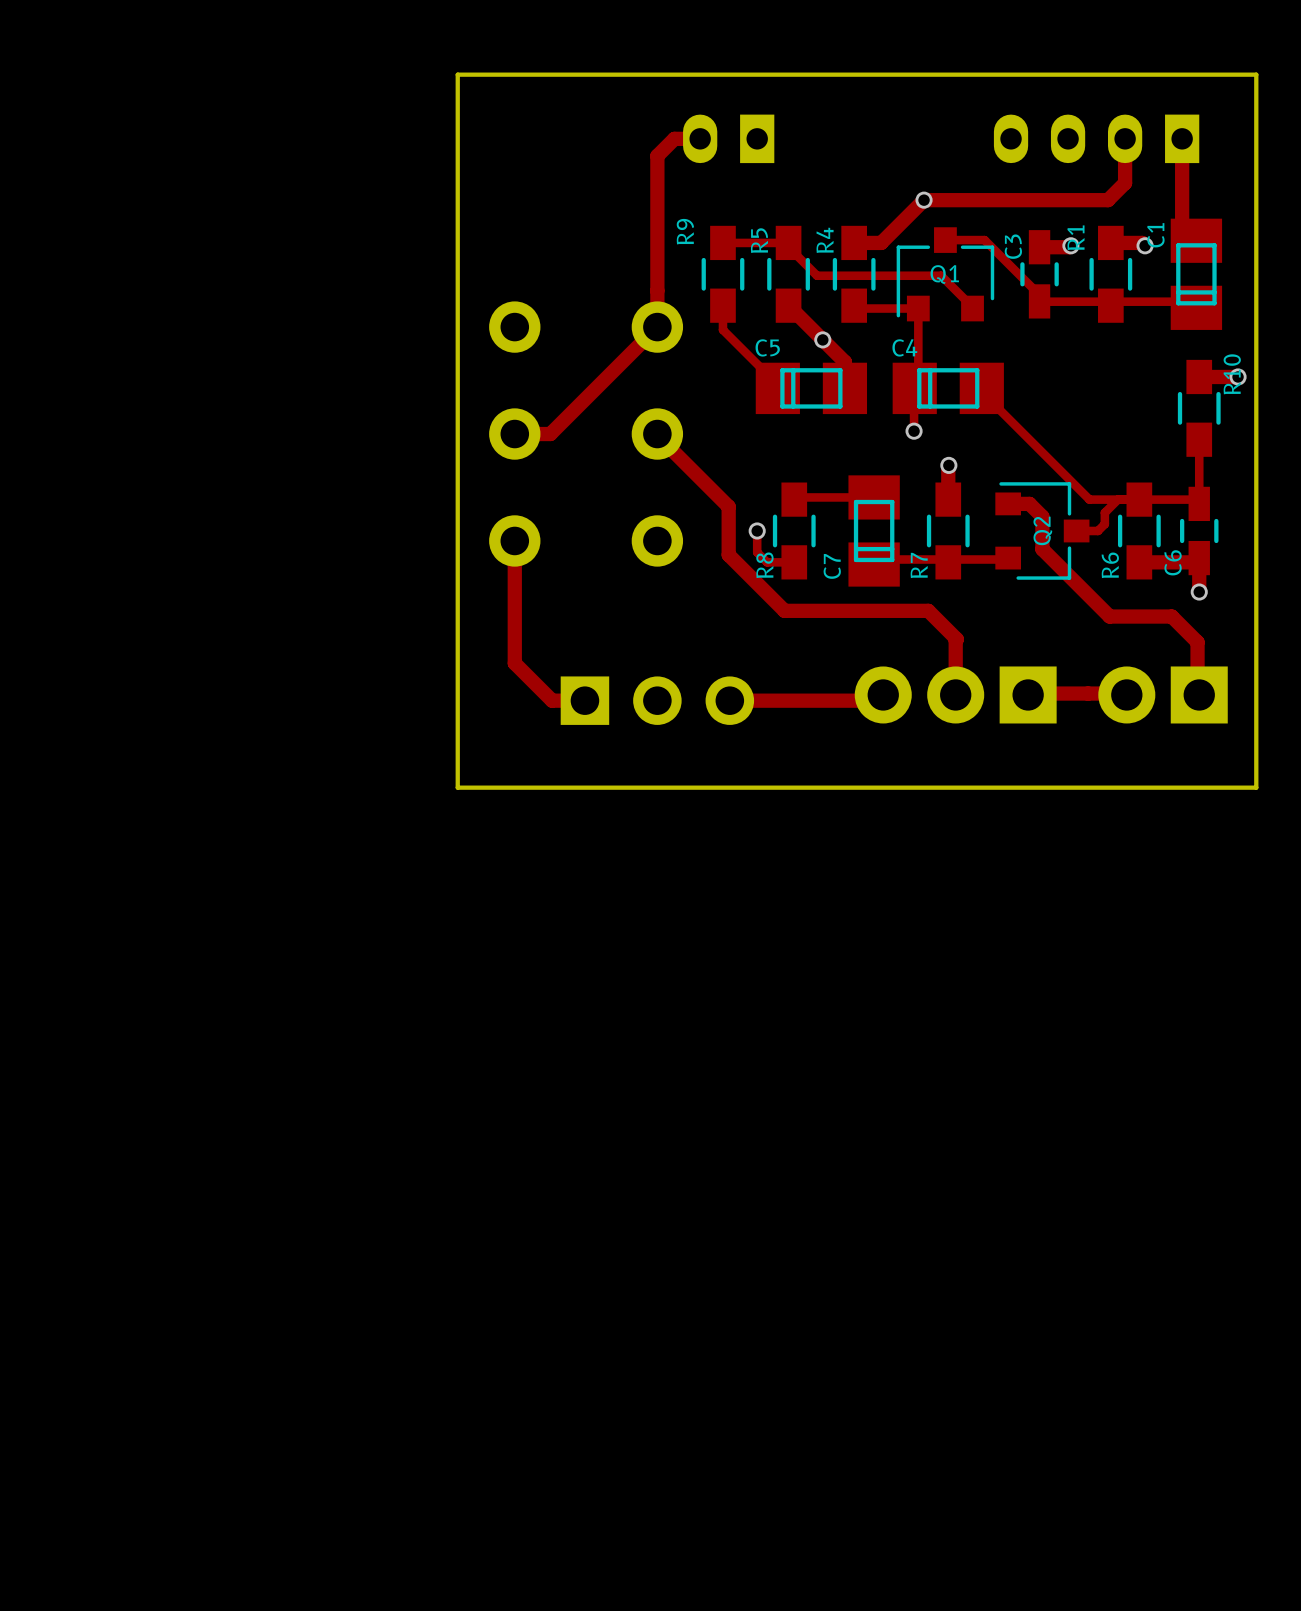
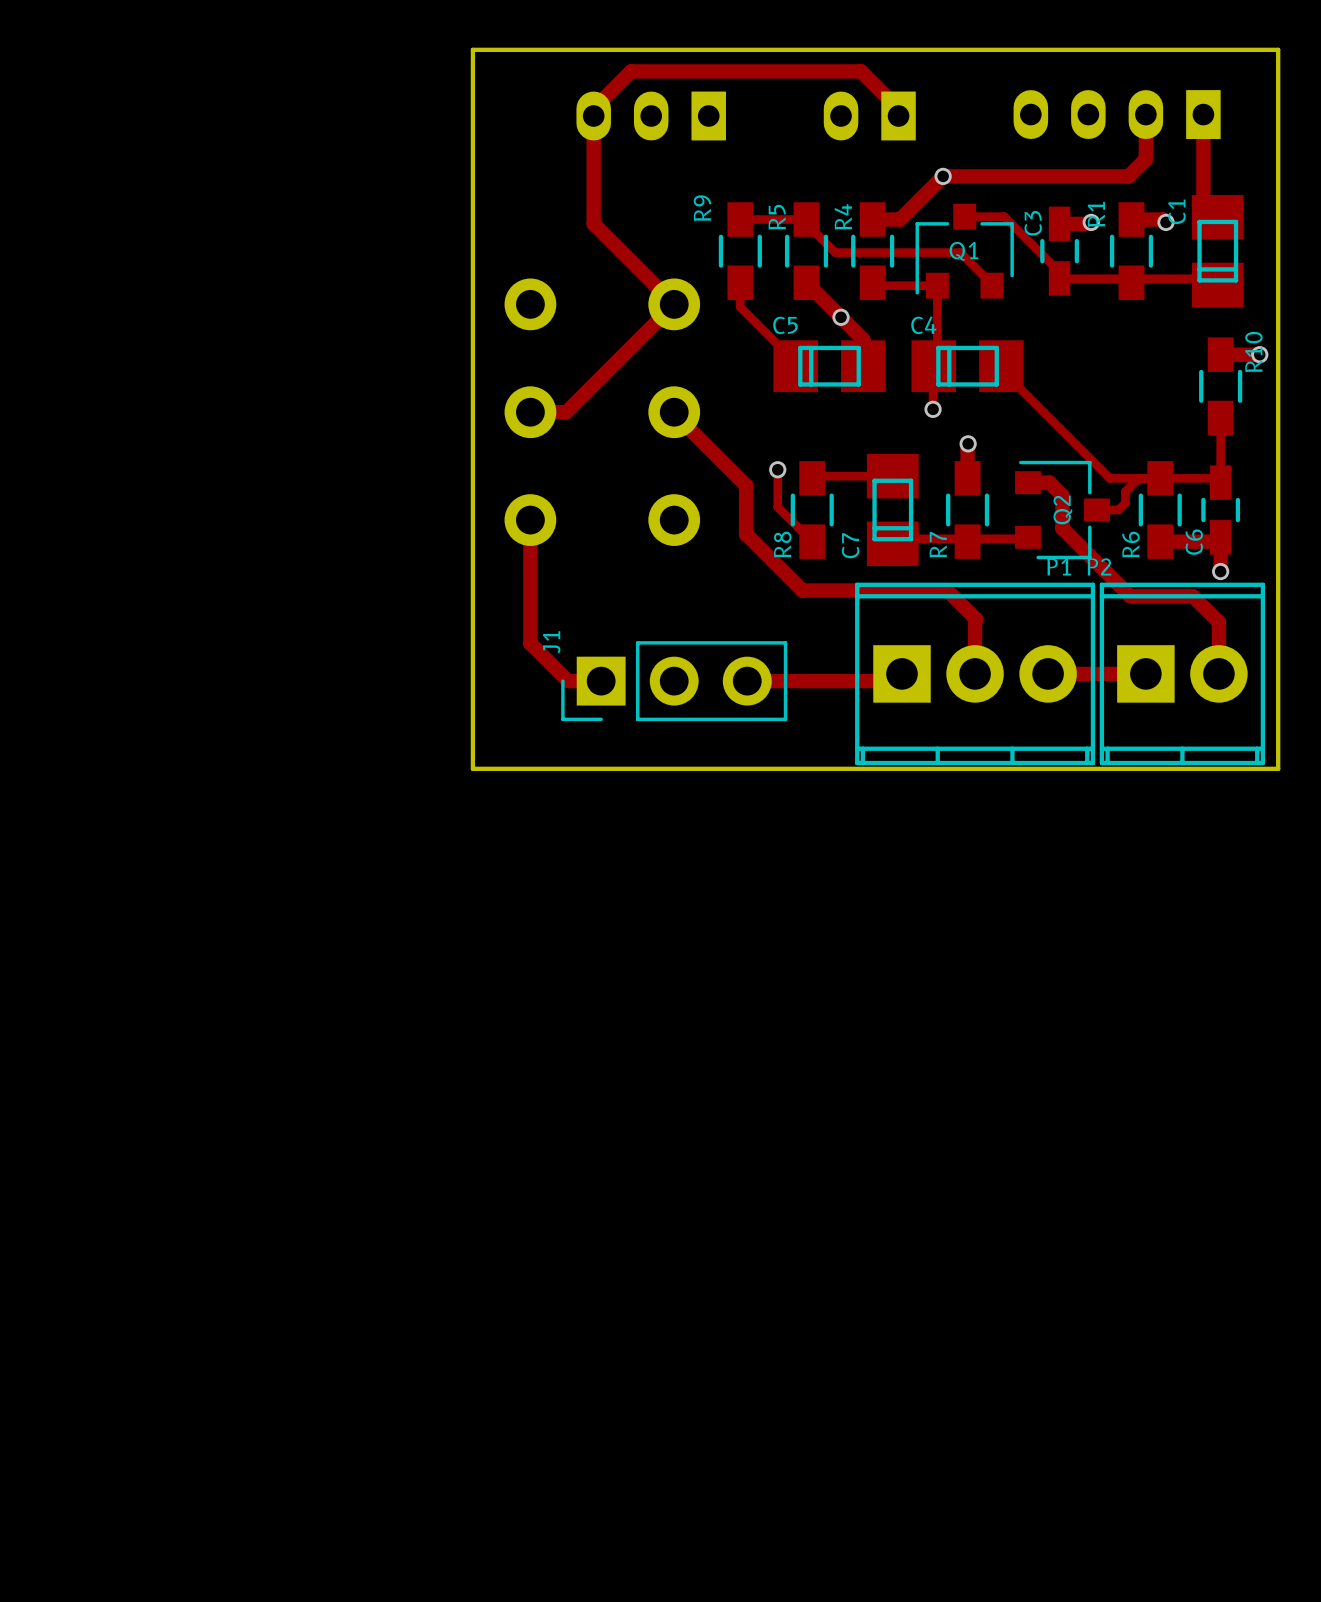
track: (700, 138) (674, 138) (657, 155) (657, 327) -> (898, 115) (898, 108) (861, 71) (631, 71) (593, 108) (593, 223) (674, 304)
part position: (728, 138) -> (869, 115)
part: none -> (651, 115)
track: (757, 530) (757, 552) (767, 562) (794, 562) -> (777, 469) (777, 507) (812, 541)
via position: (757, 530) -> (777, 469)
P1 side: bottom (955, 694) -> top (975, 673)
P2 side: bottom (1163, 694) -> top (1182, 673)
J1 side: bottom (657, 700) -> top (674, 681)

